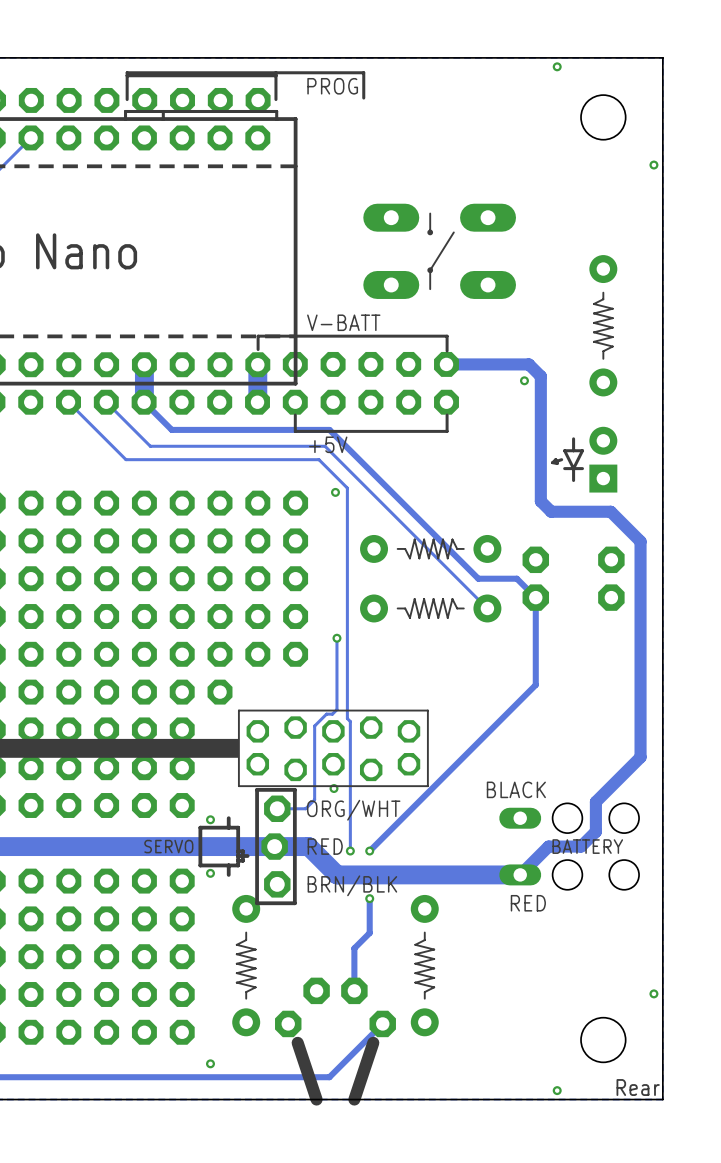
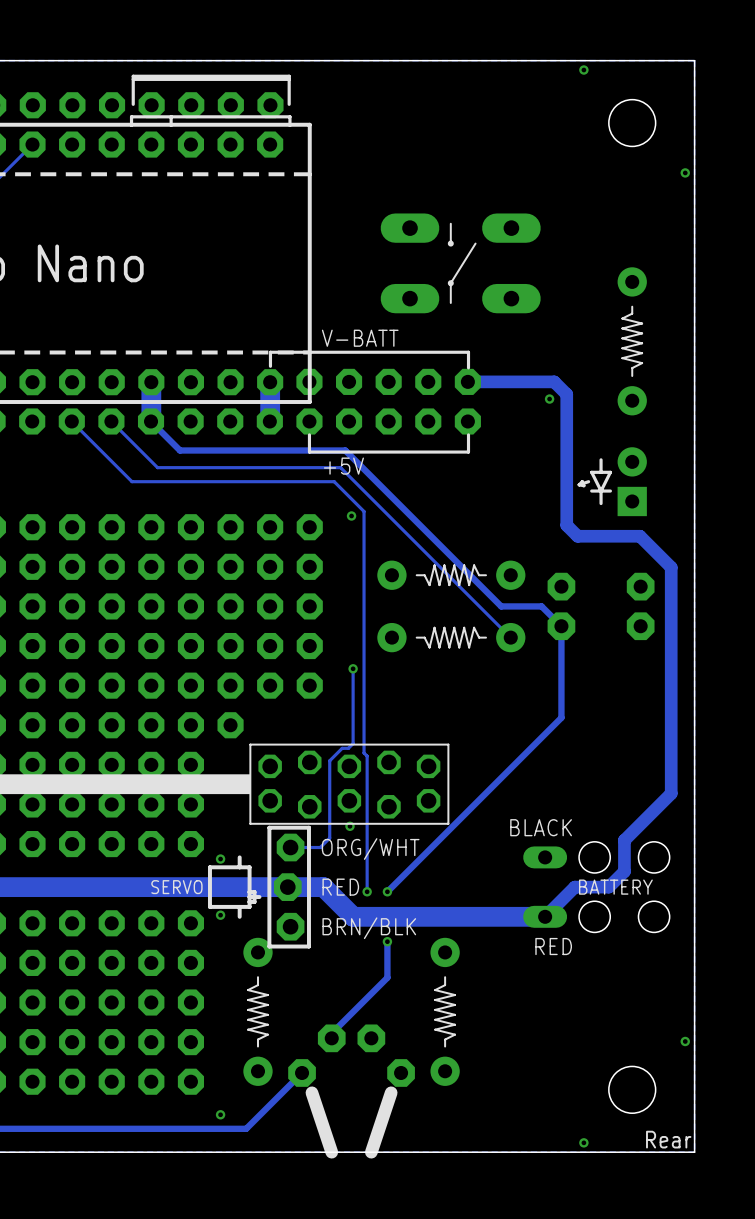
line: (275, 72) (363, 72) (363, 98) -> none
text: PROG (332, 86) -> none
track: (354, 948) (354, 990) -> (371, 993) (331, 1033)
track: (382, 1023) (329, 1077) (234, 1077) -> (302, 1072) (246, 1128)

